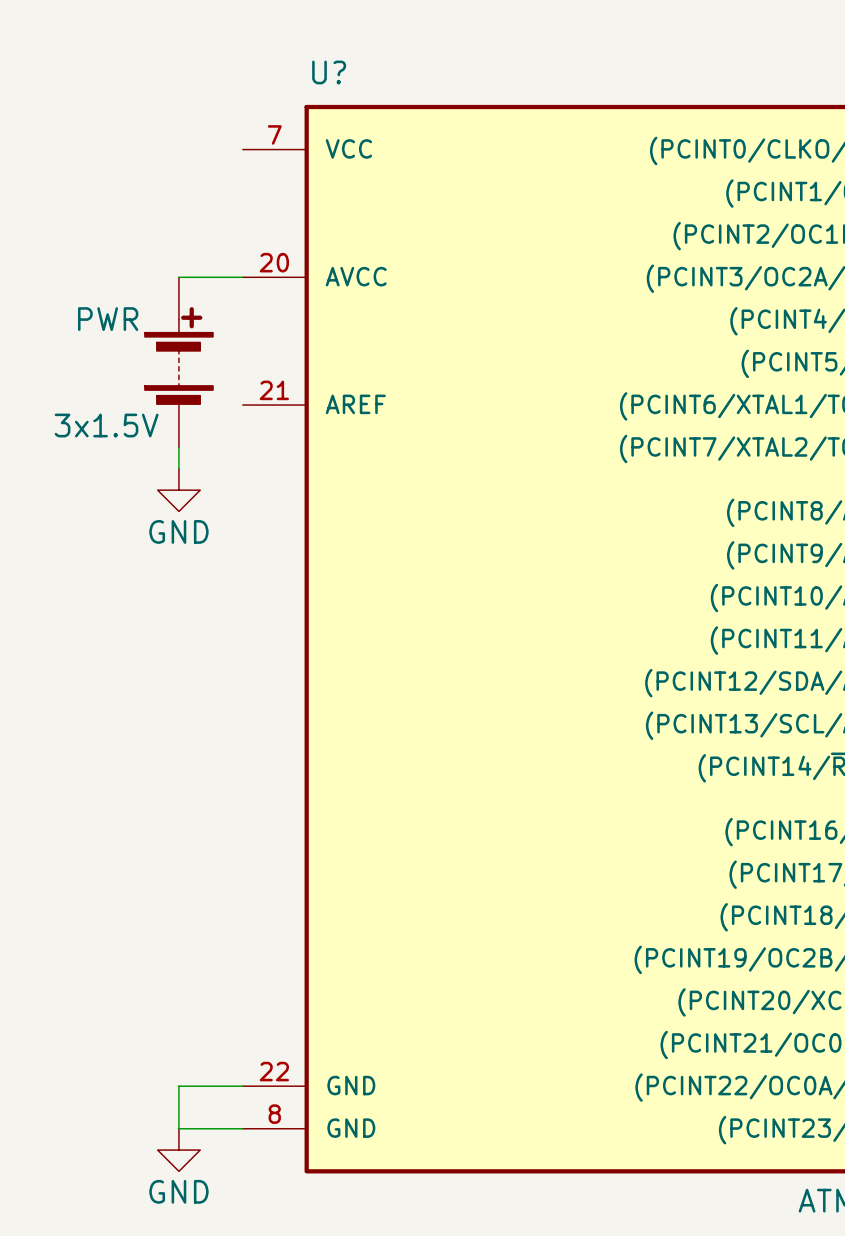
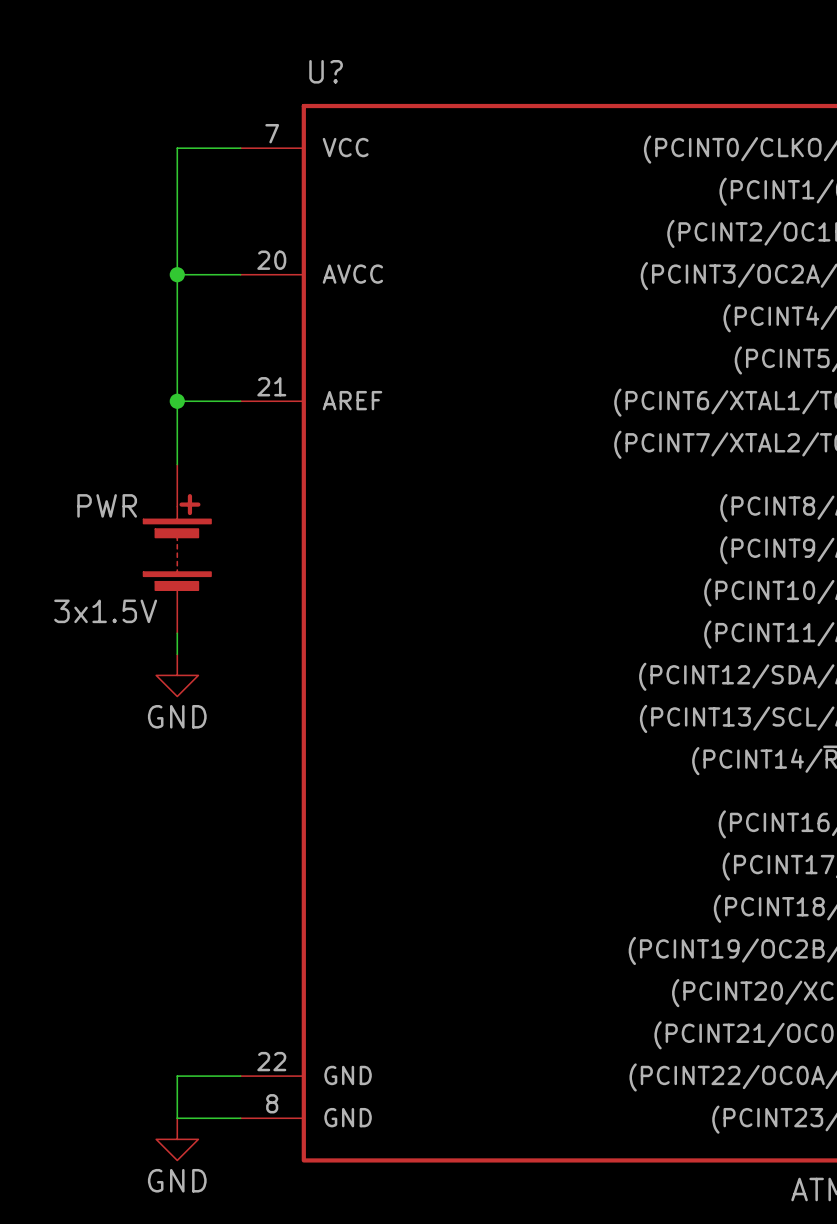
wire: none -> (240, 148) (177, 148) (177, 443)
junction: none -> (177, 274)
PWR position: (178, 362) -> (177, 548)
wire: none -> (177, 401) (240, 401)
junction: none -> (177, 401)
power symbol position: GND (178, 490) -> GND (177, 675)
wire: none -> (177, 633) (177, 654)

